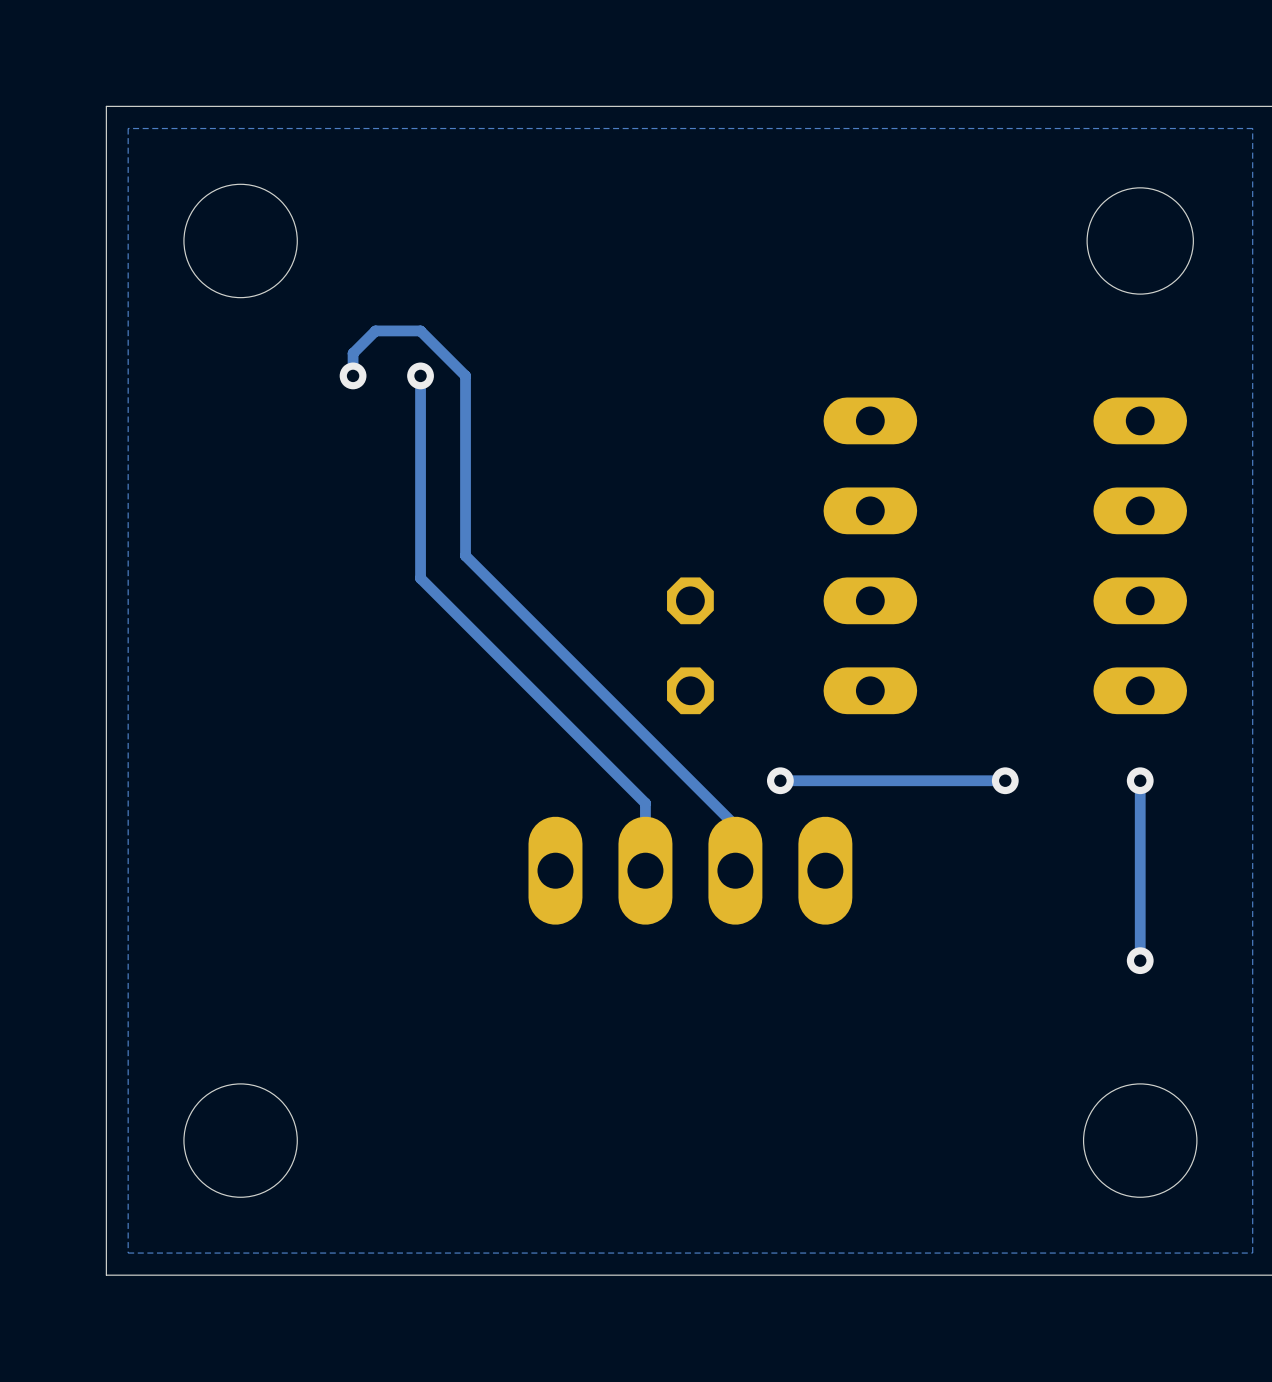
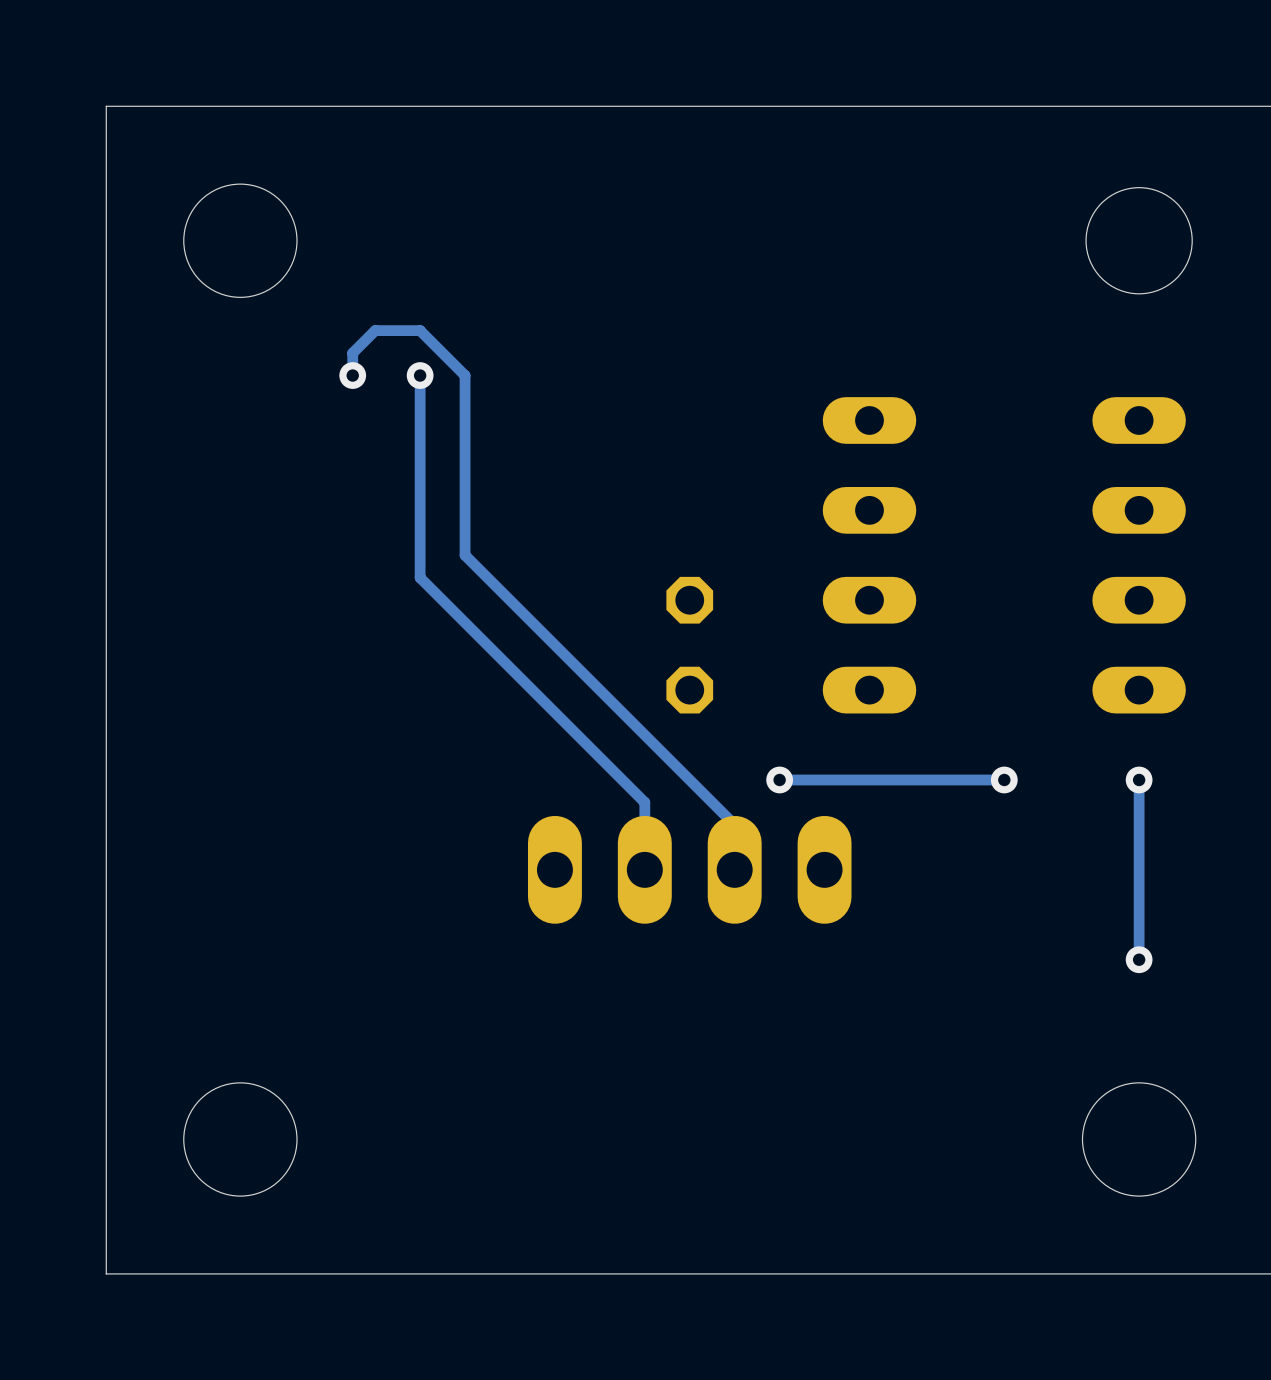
zone outline: (1252, 128) (128, 128) (128, 1253) (1252, 1253) (1252, 128) -> none

